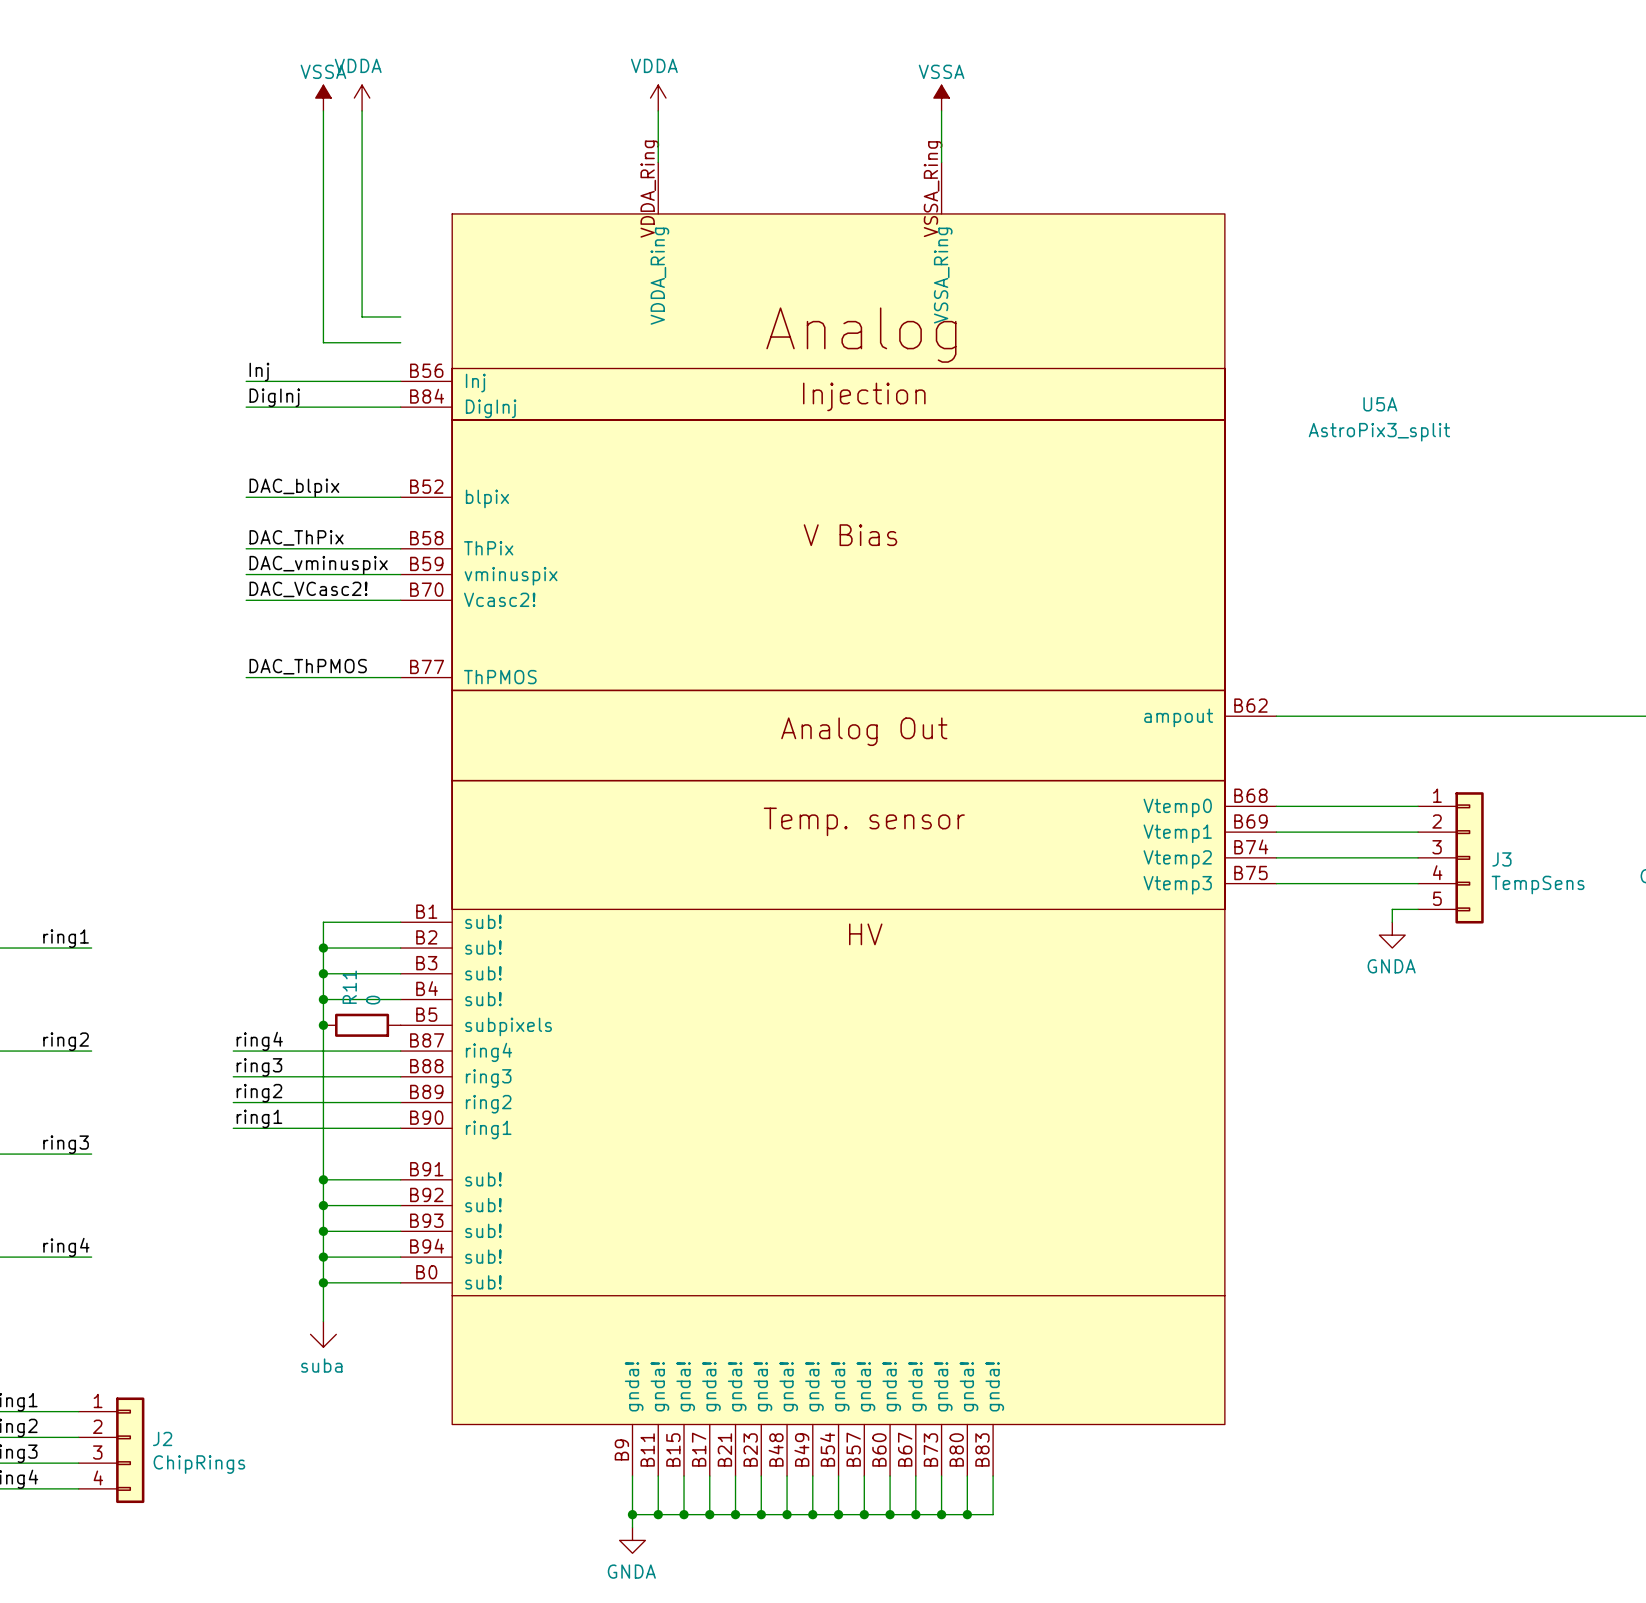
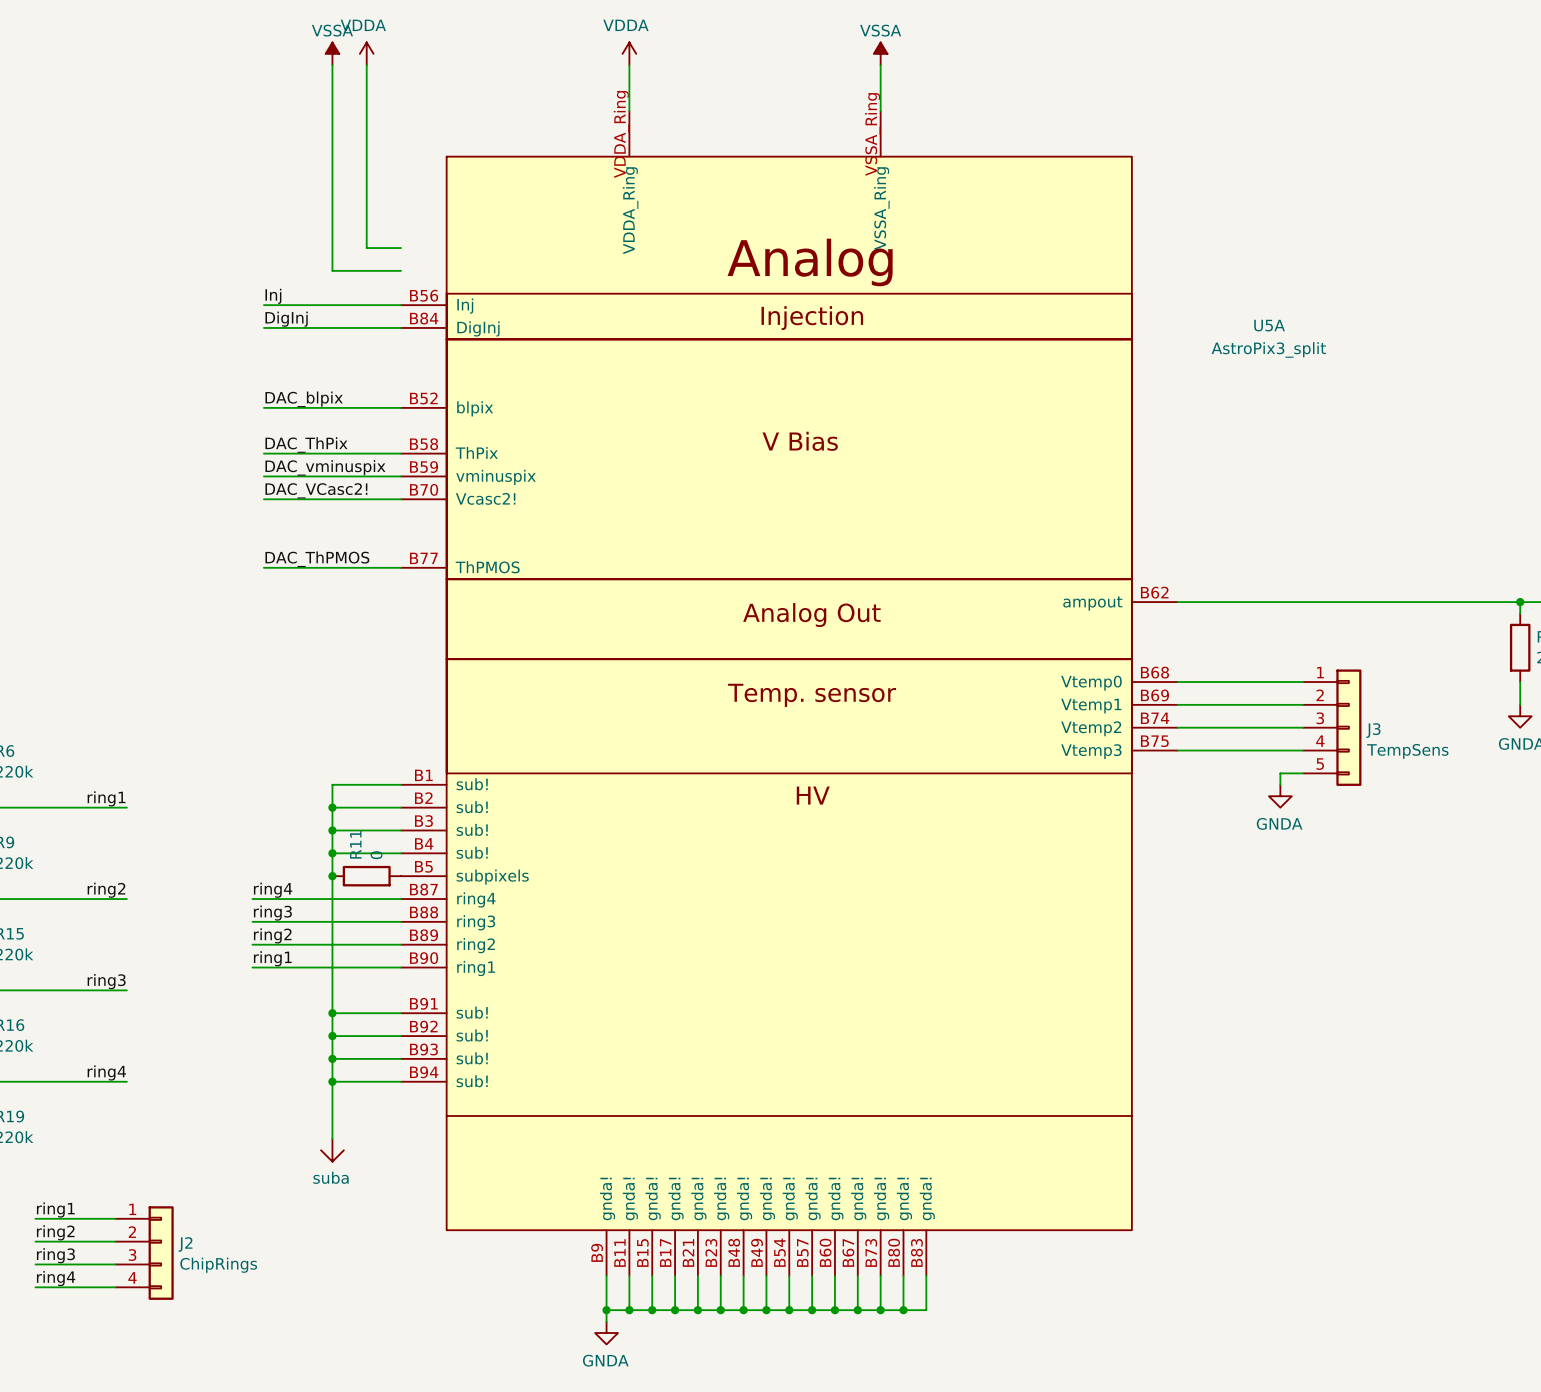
U5A symbol: [400, 162, 1277, 1477] -> [400, 110, 1178, 1276]
wire: (323, 1282) (400, 1282) -> none
junction: (323, 1282) -> none

